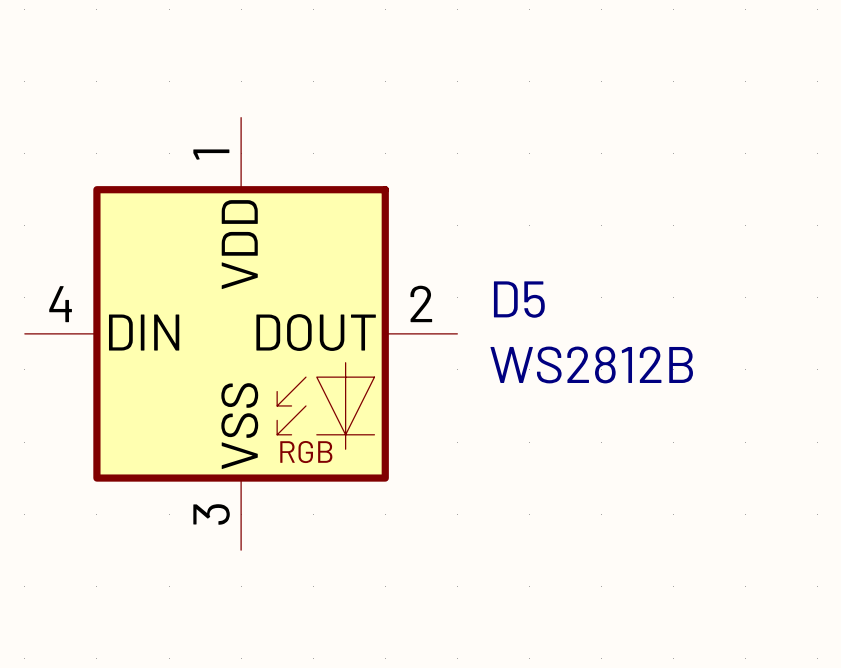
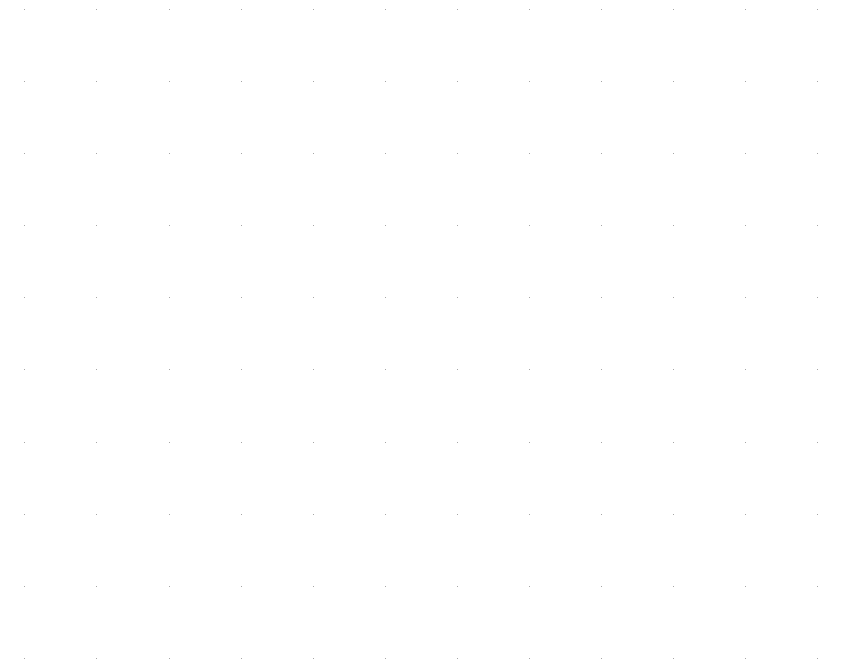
D5: WS2812B (241, 333) -> none

